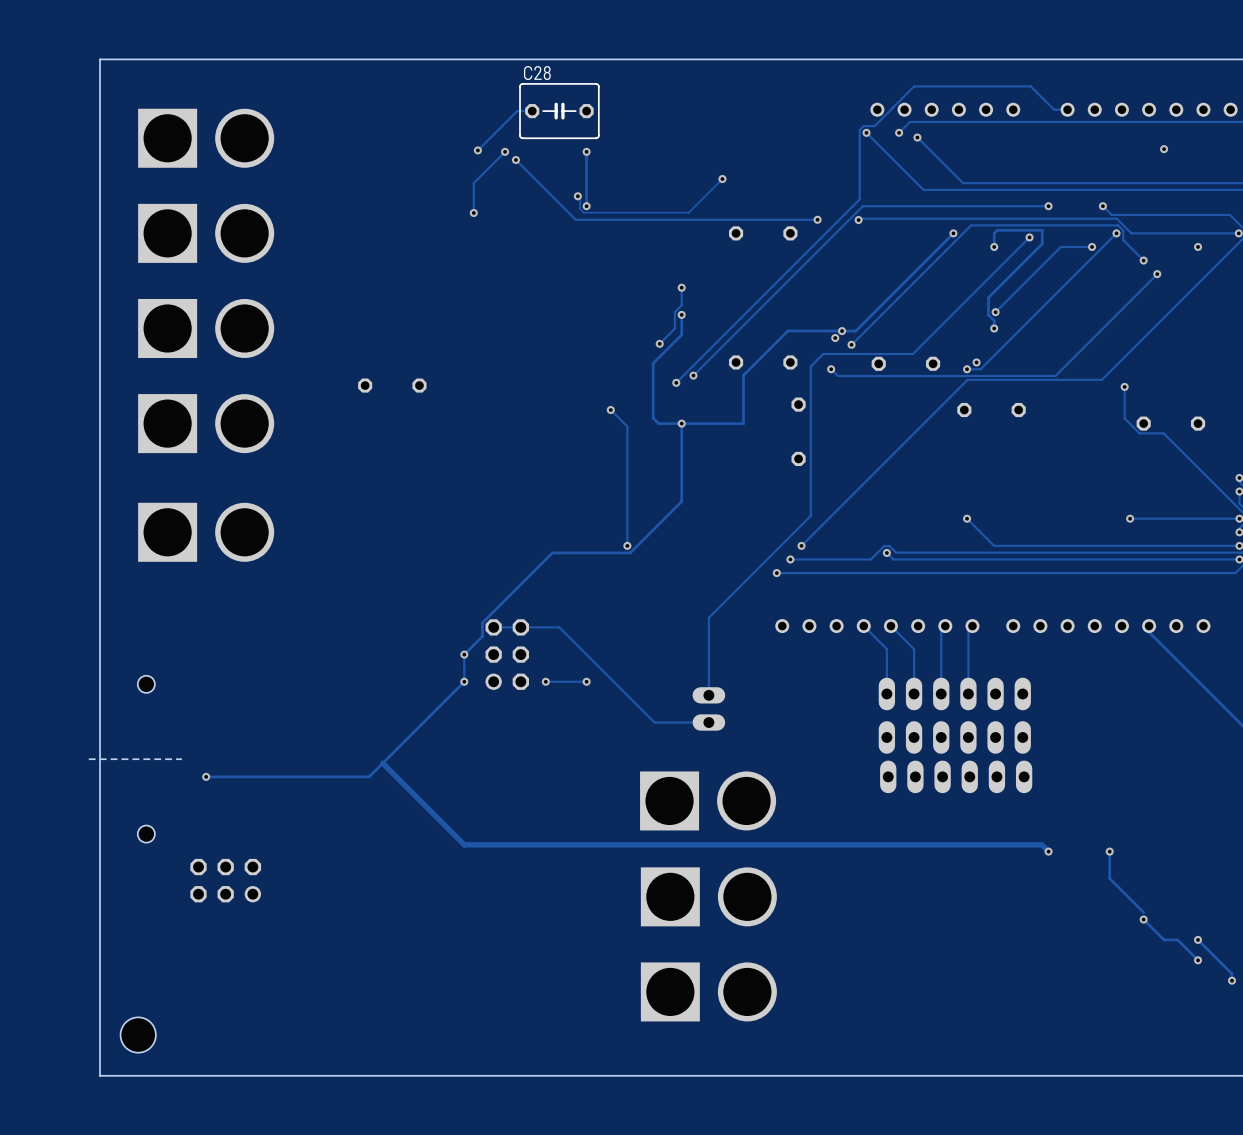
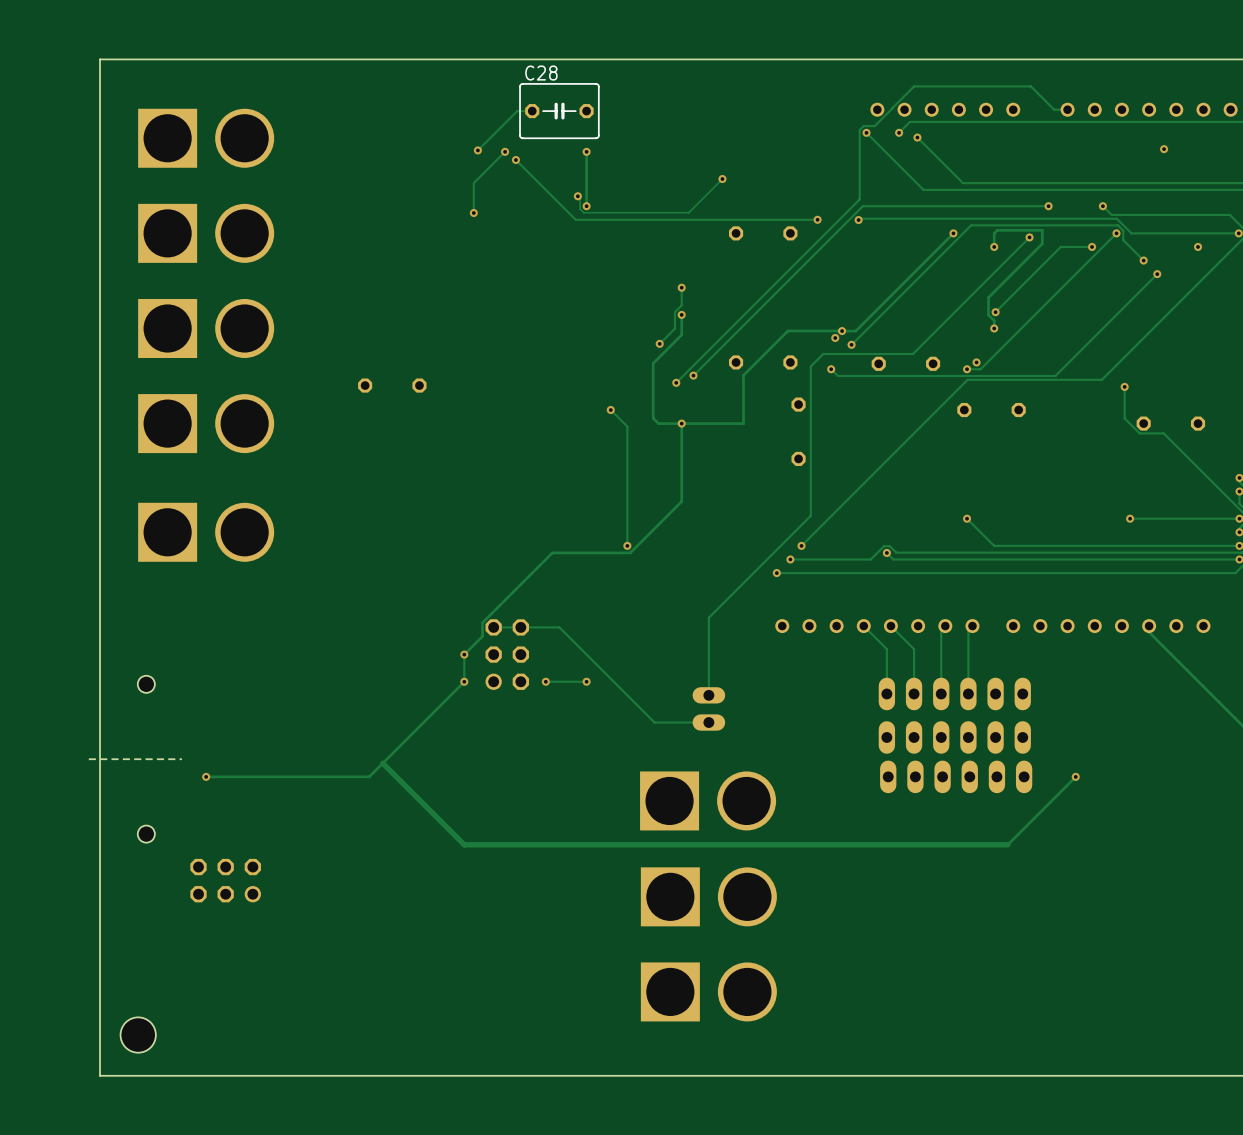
via: none -> (1075, 776)
track: (1007, 844) (1041, 844) (1048, 851) -> (1007, 844) (1075, 776)
via: (1048, 851) -> none
track: (1109, 851) (1109, 878) (1143, 912) -> none
via: (1109, 851) -> none
track: (1143, 919) (1164, 939) (1177, 939) (1198, 960) -> none
via: (1143, 919) -> none
track: (1198, 939) (1232, 973) (1232, 980) -> none
via: (1198, 939) -> none
via: (1198, 960) -> none
via: (1232, 980) -> none

